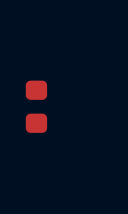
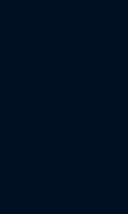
part: (36, 106) -> none

